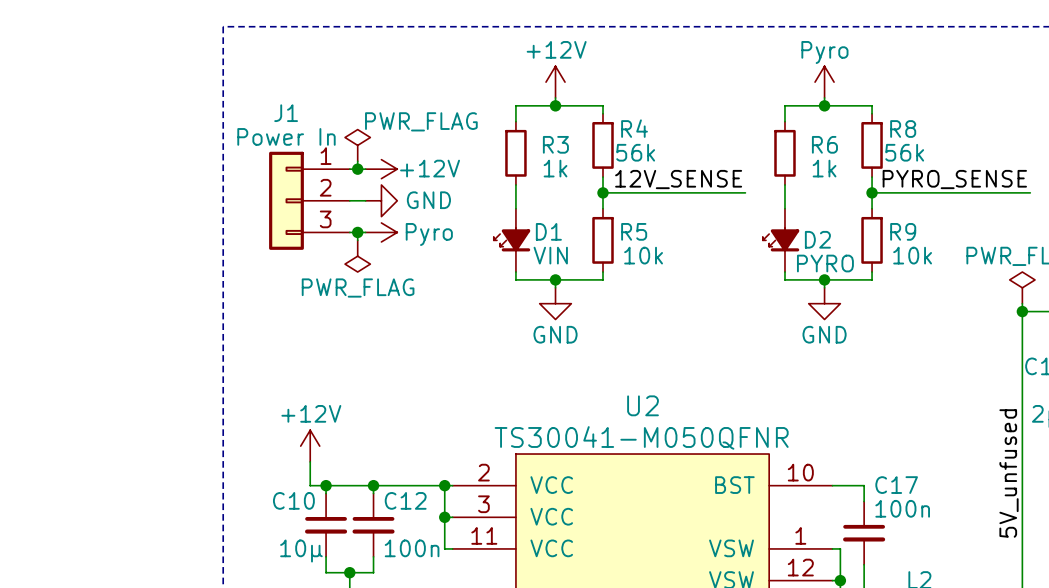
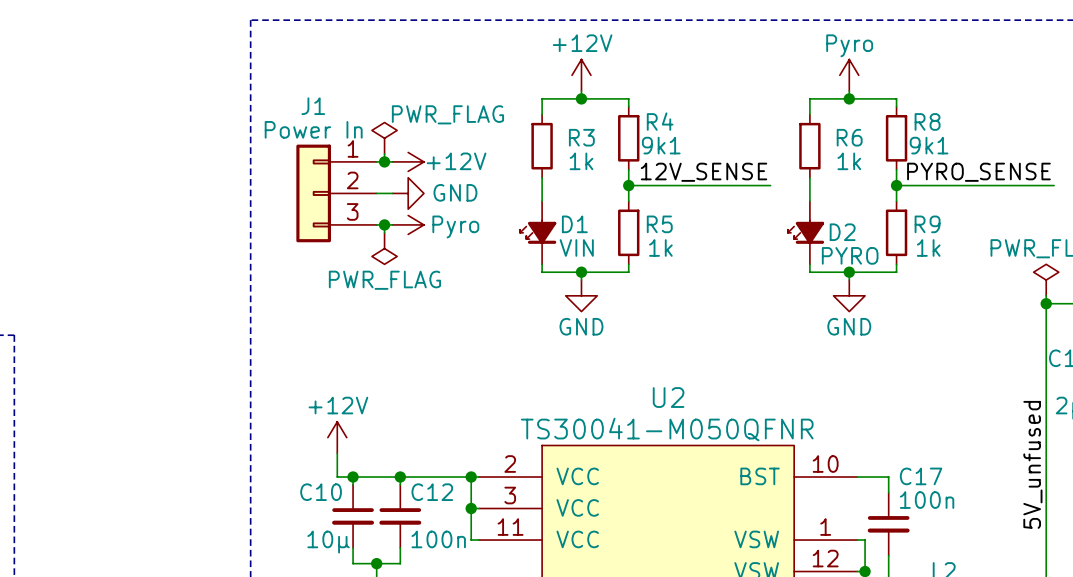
R4 value: 56k (635, 152) -> 9k1 (661, 145)
R8 value: 56k (904, 152) -> 9k1 (929, 145)
R5 value: 10k (643, 255) -> 1k (660, 247)
R9 value: 10k (912, 255) -> 1k (928, 247)

